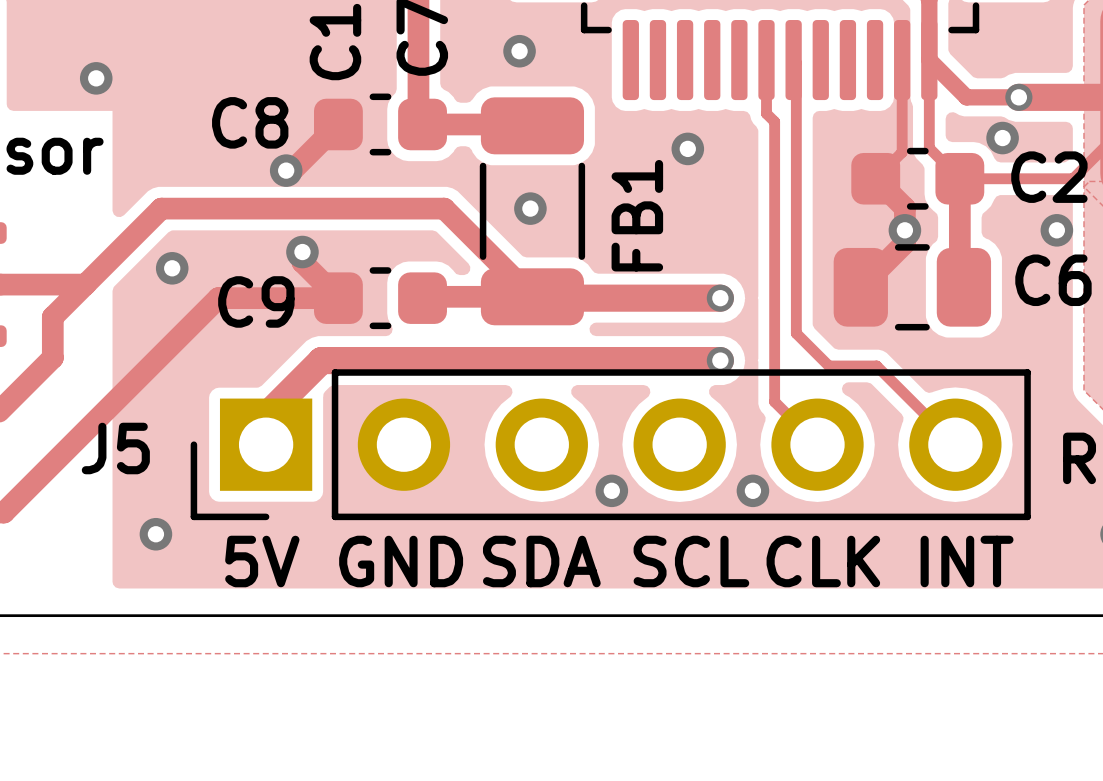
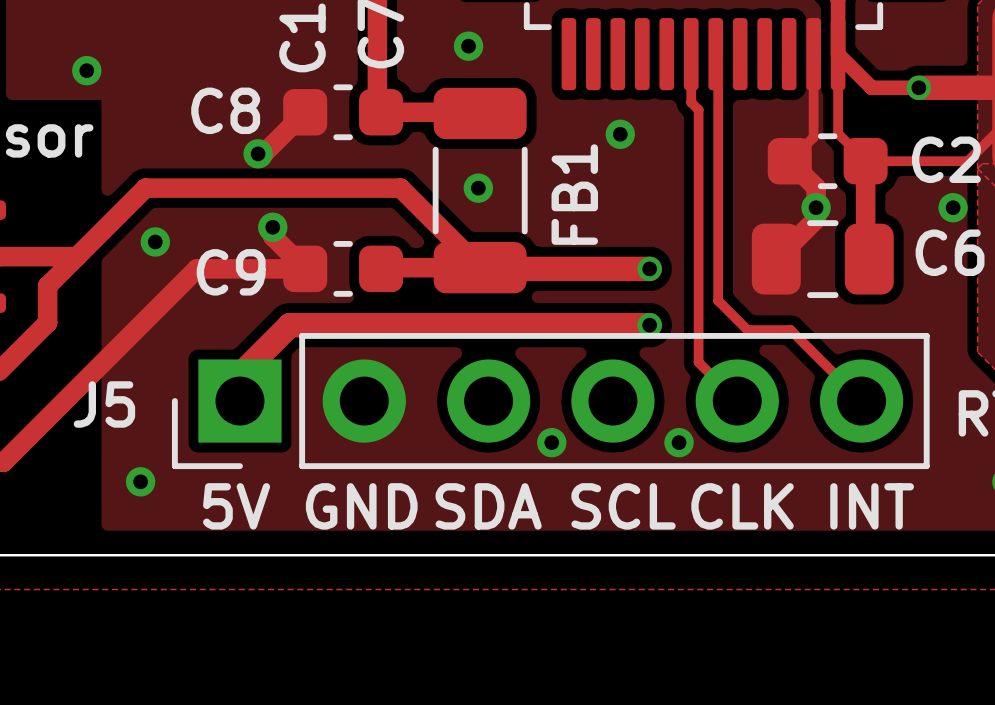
via: (1002, 138) -> none

